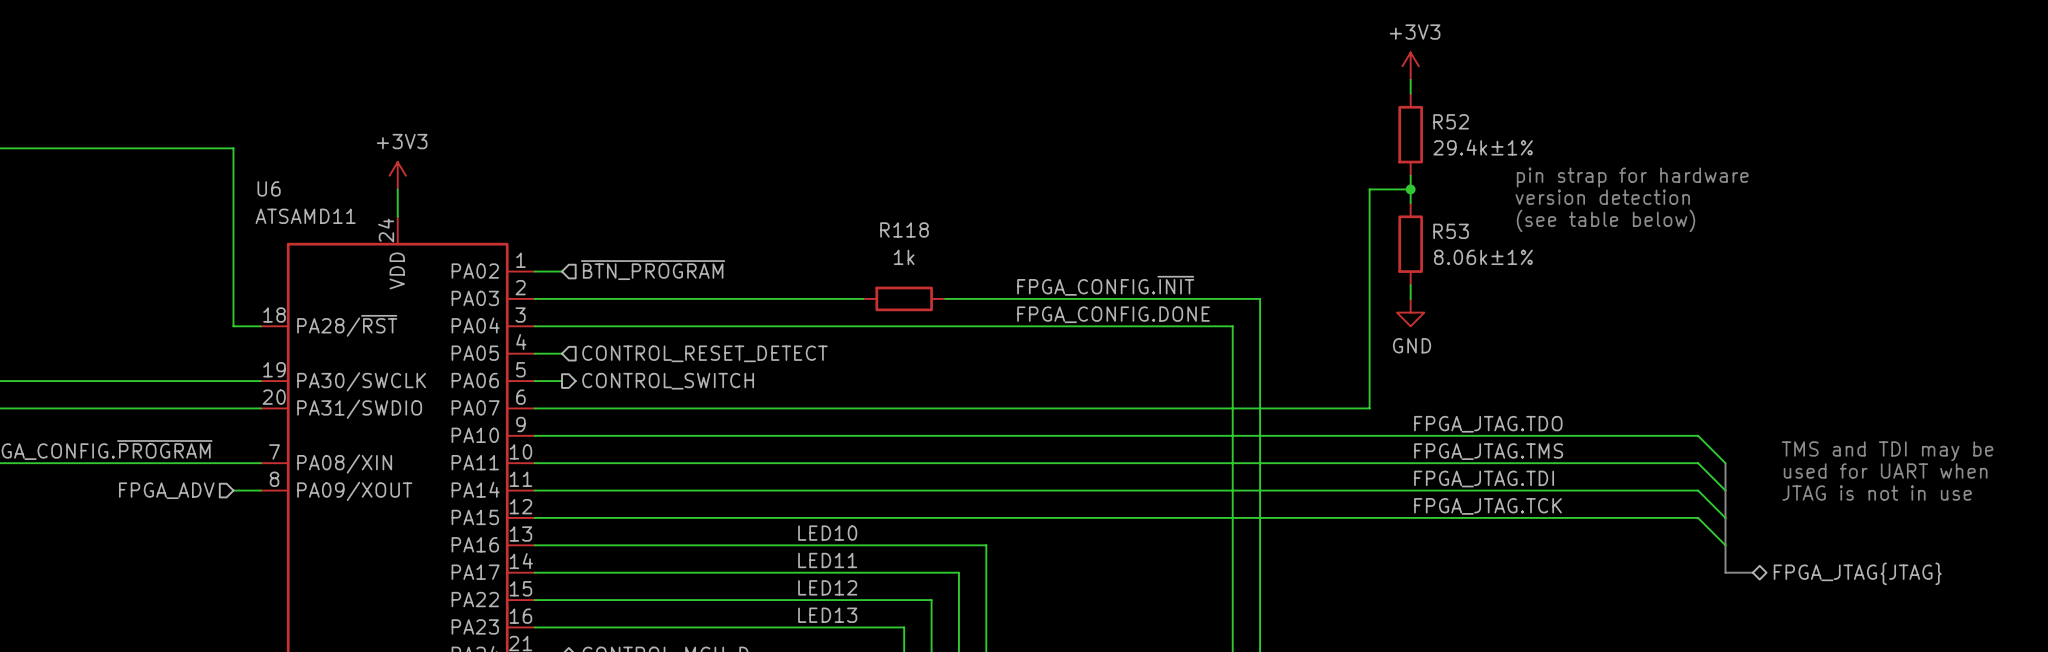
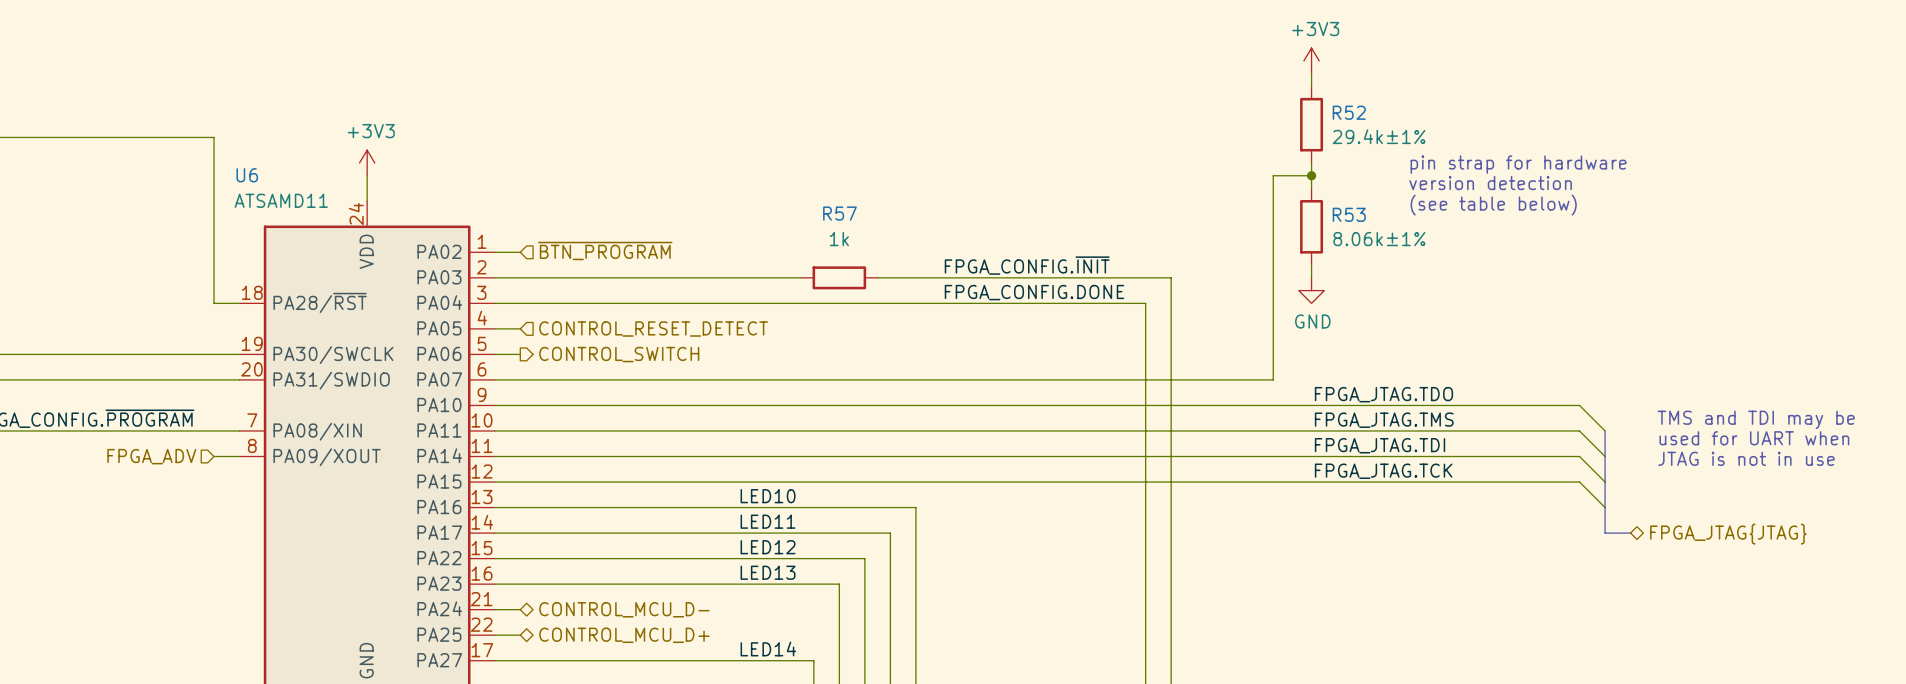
R118 name: R118 (904, 229) -> R57 (839, 213)

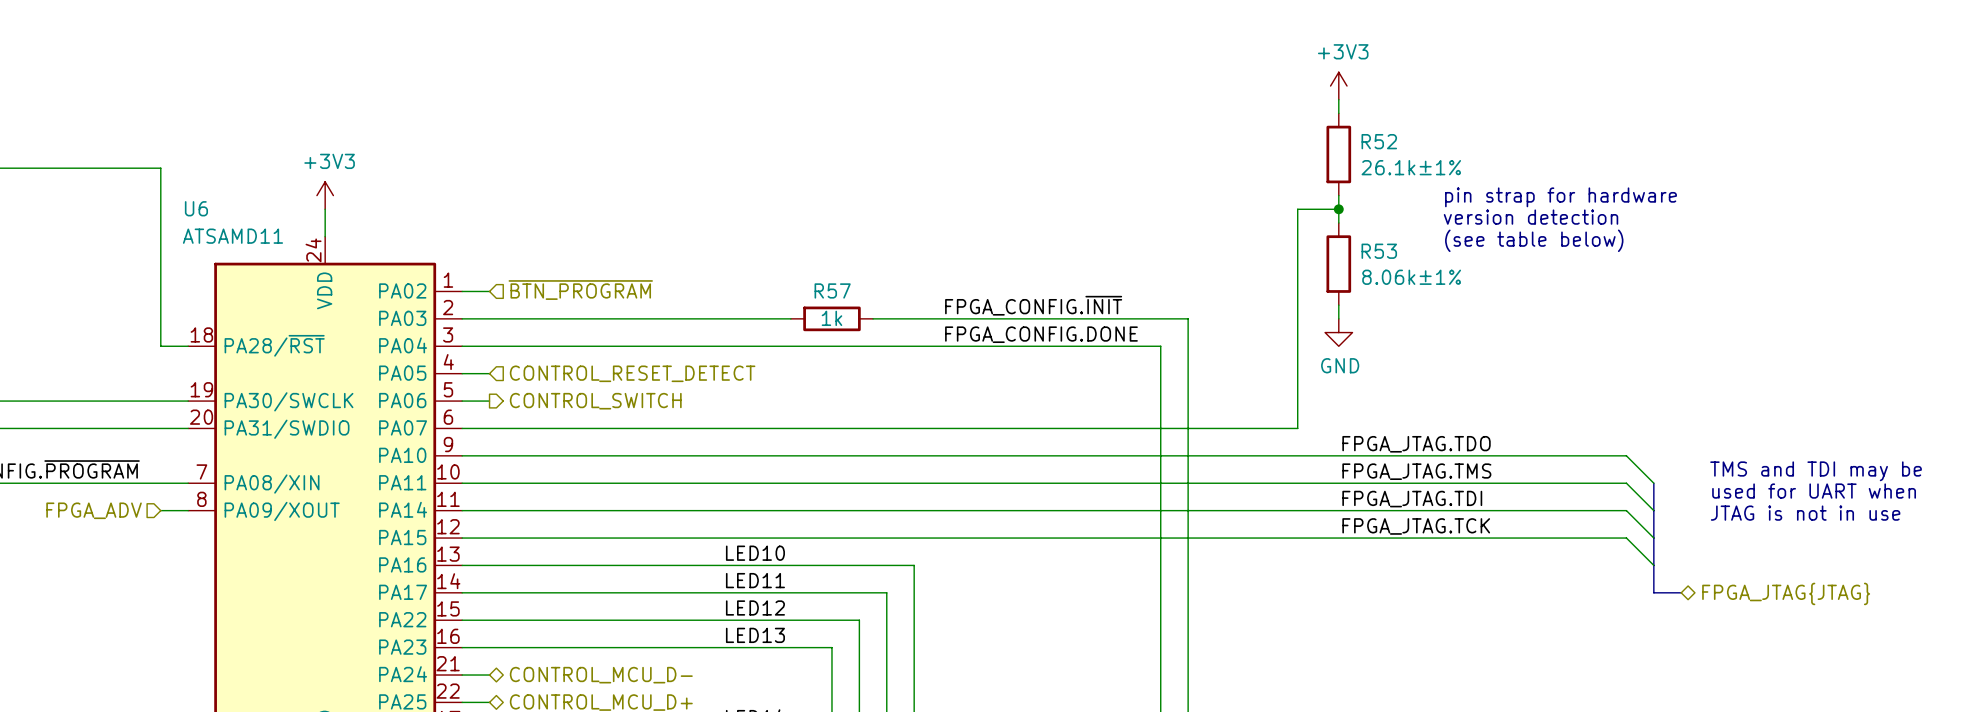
R52 value: 29.4k±1% (1379, 136) -> 26.1k±1% (1411, 167)
R57 name position: R57 (839, 213) -> R57 (832, 290)
R57 value position: 1k (839, 239) -> 1k (831, 318)

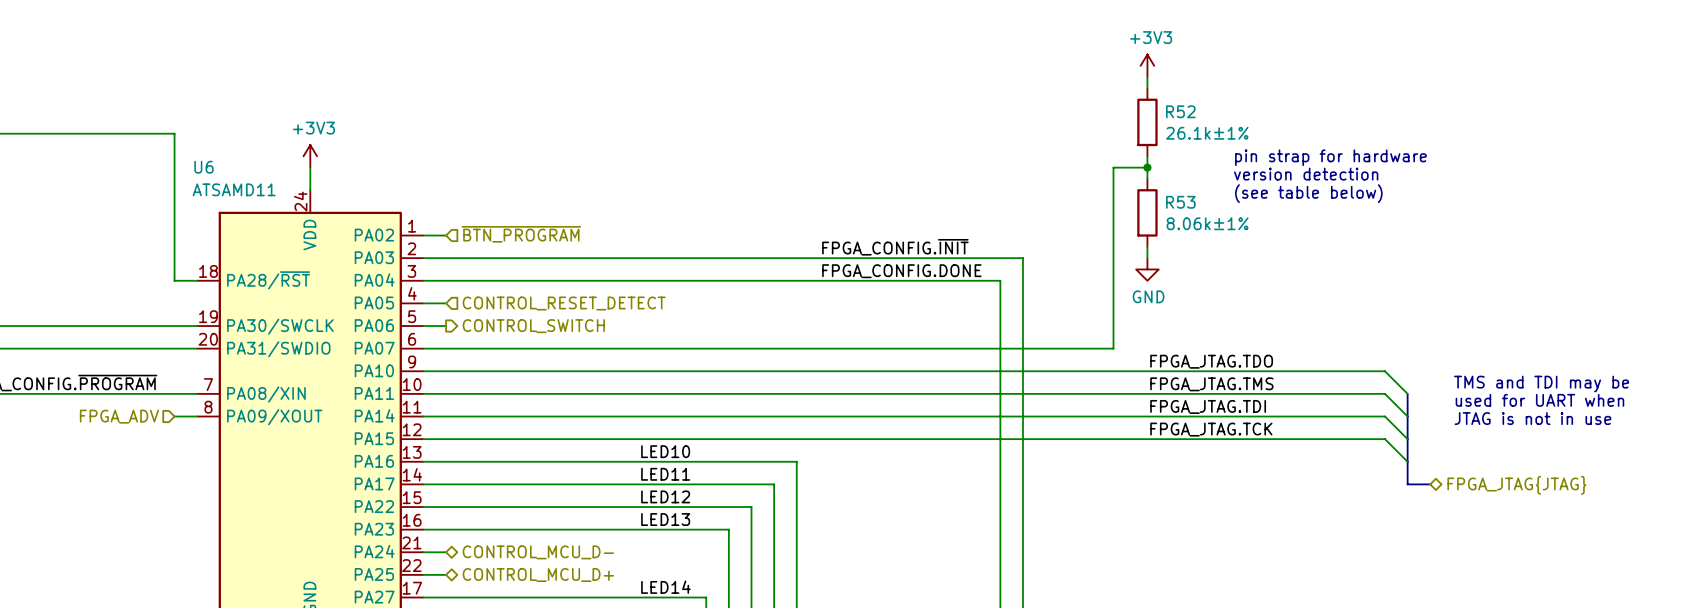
wire: none -> (694, 258) (762, 258)
R57: 1k (831, 318) -> none

